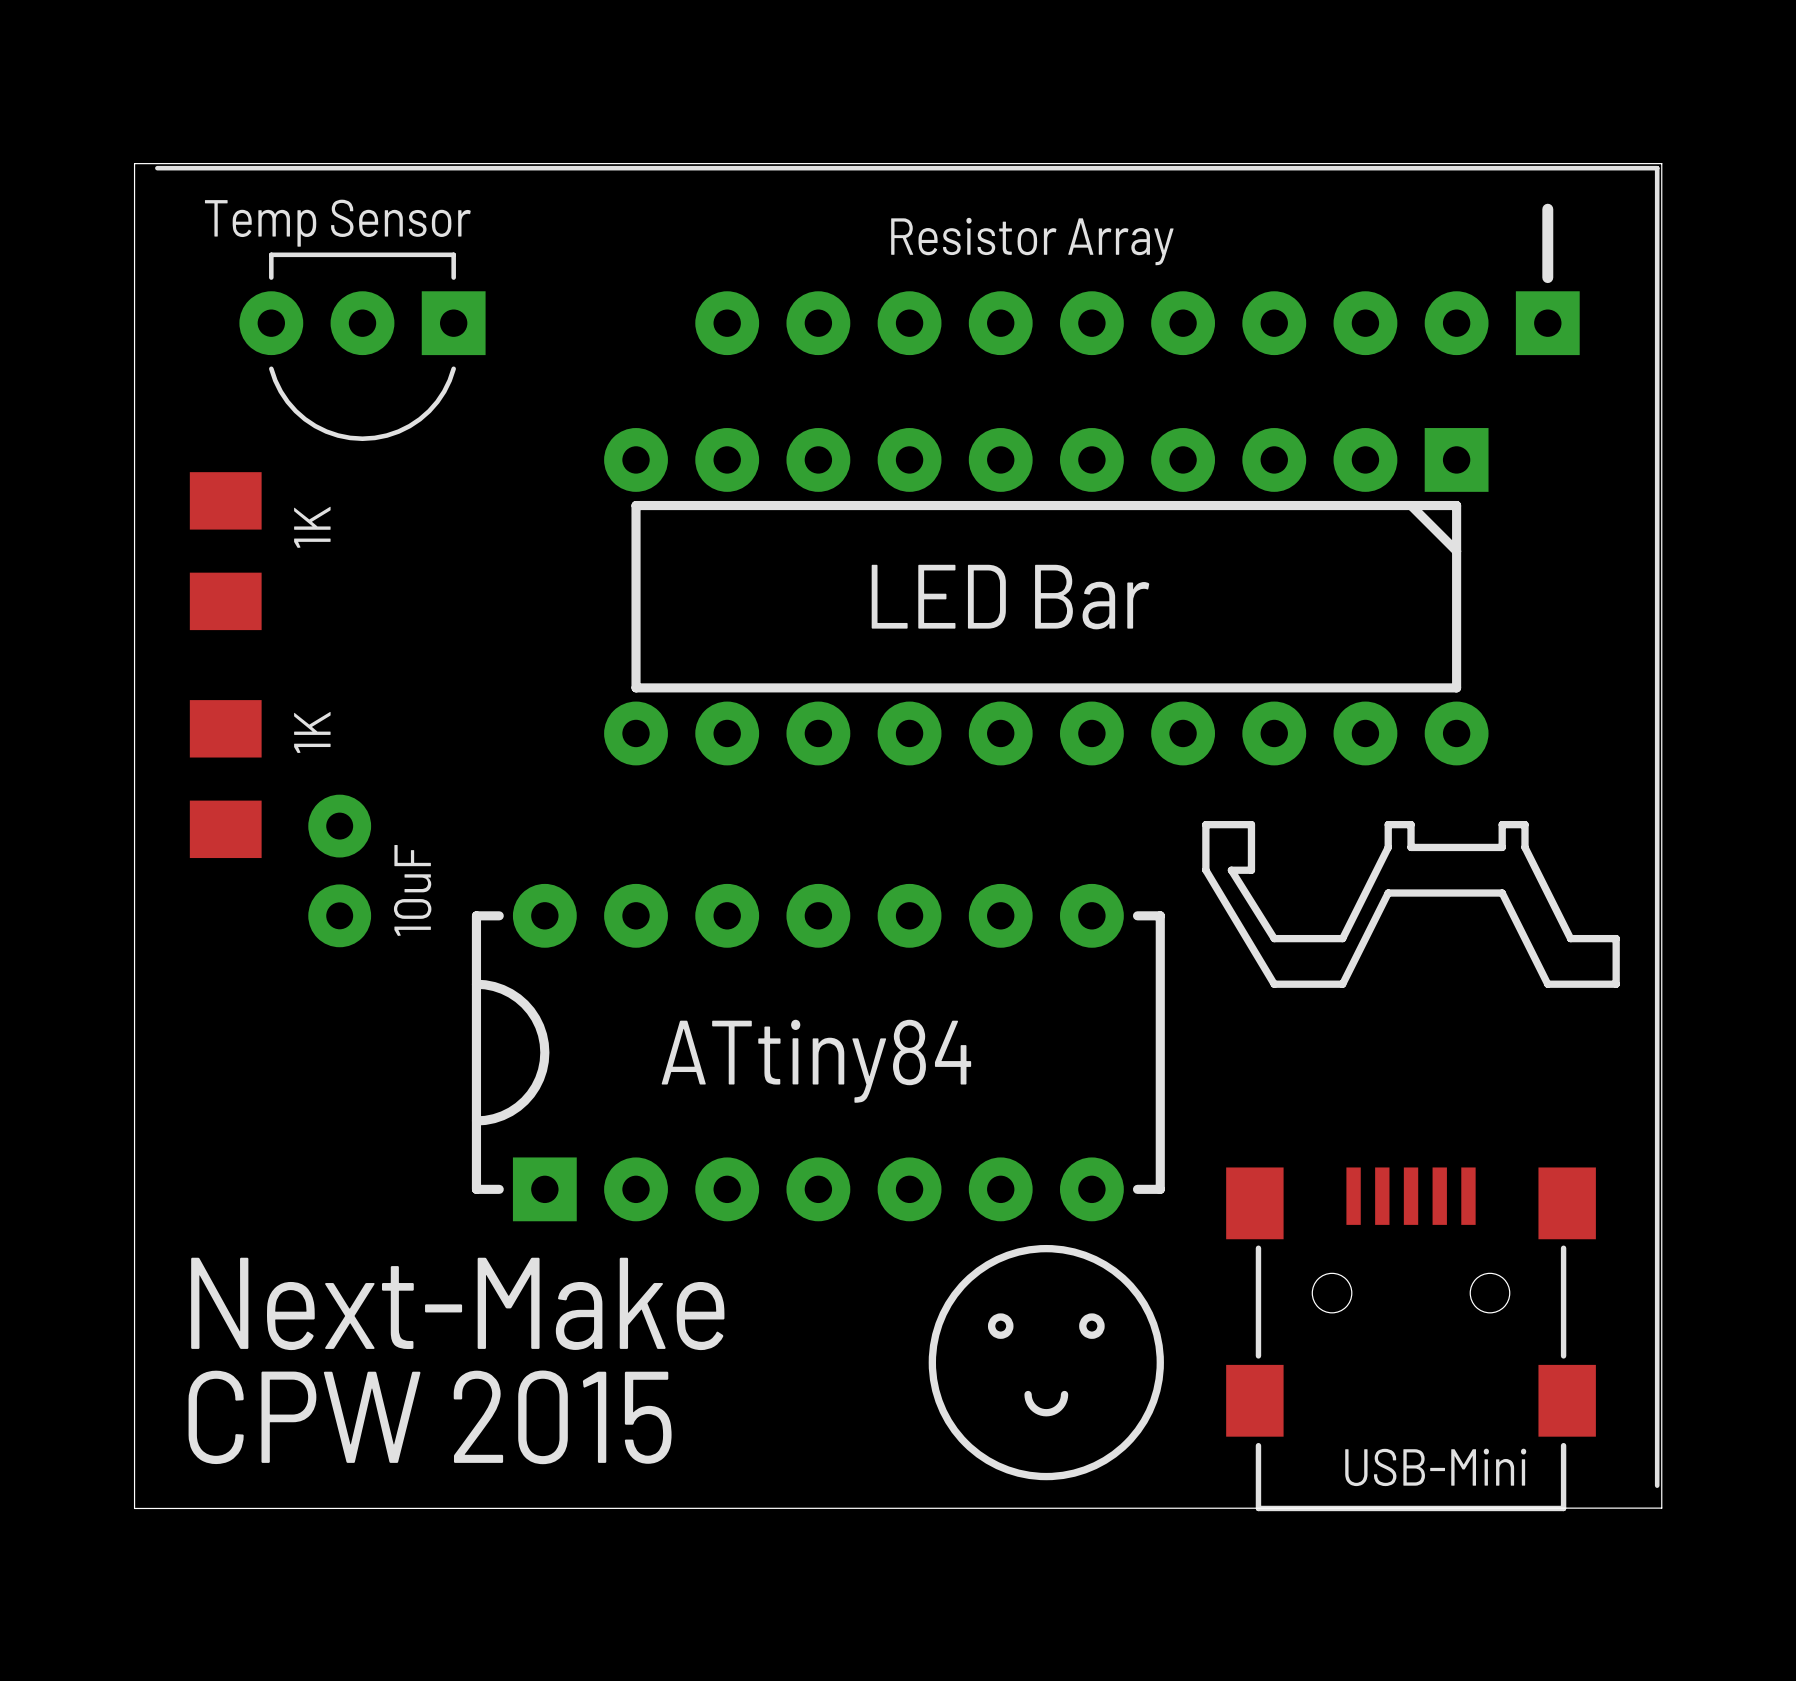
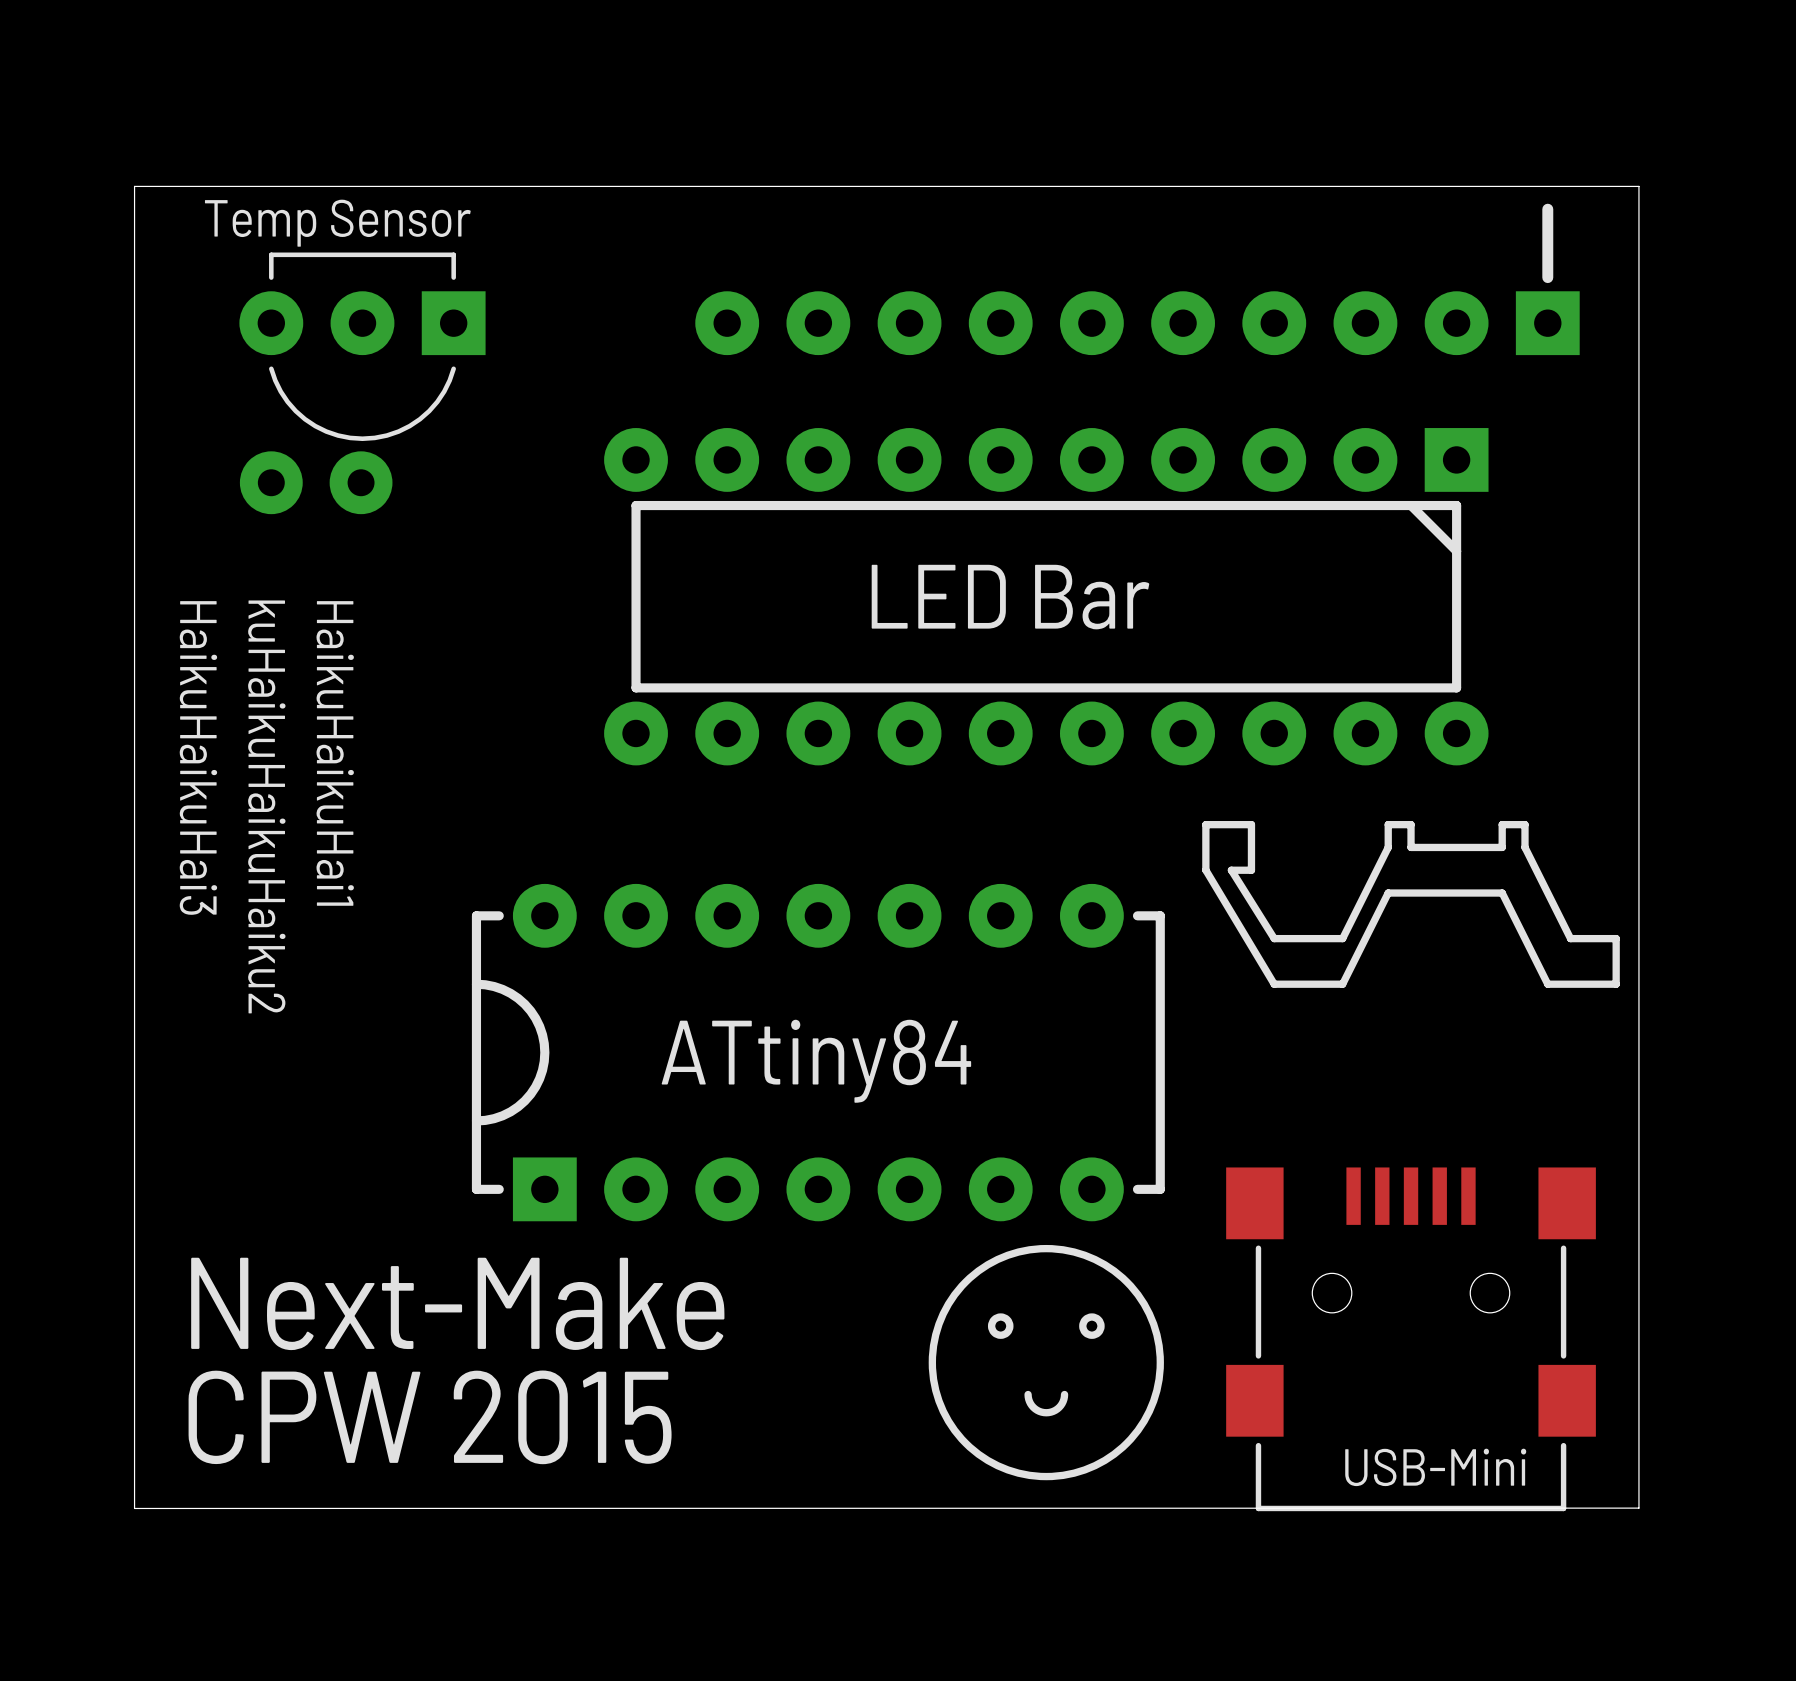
line: (157, 168) (1657, 168) (1657, 1485) -> none
board edge: (134, 186) (134, 163) (1661, 163) (1661, 1508) (1638, 1508) -> (134, 186) (1638, 186) (1638, 1508)
text: Resistor Array (1032, 241) -> none
part: 1K (225, 551) -> none
text: none -> HaikuHaikuHai1 (335, 753)
text: none -> HaikuHaikuHai3 (198, 757)
part: 1K (225, 779) -> none
text: none -> kuHaikuHaikuHaiku2 (266, 806)
part rotation: 0° (339, 870) -> 90° clockwise (316, 482)
part position: (339, 870) -> (316, 482)
text: 10uF (412, 890) -> none

